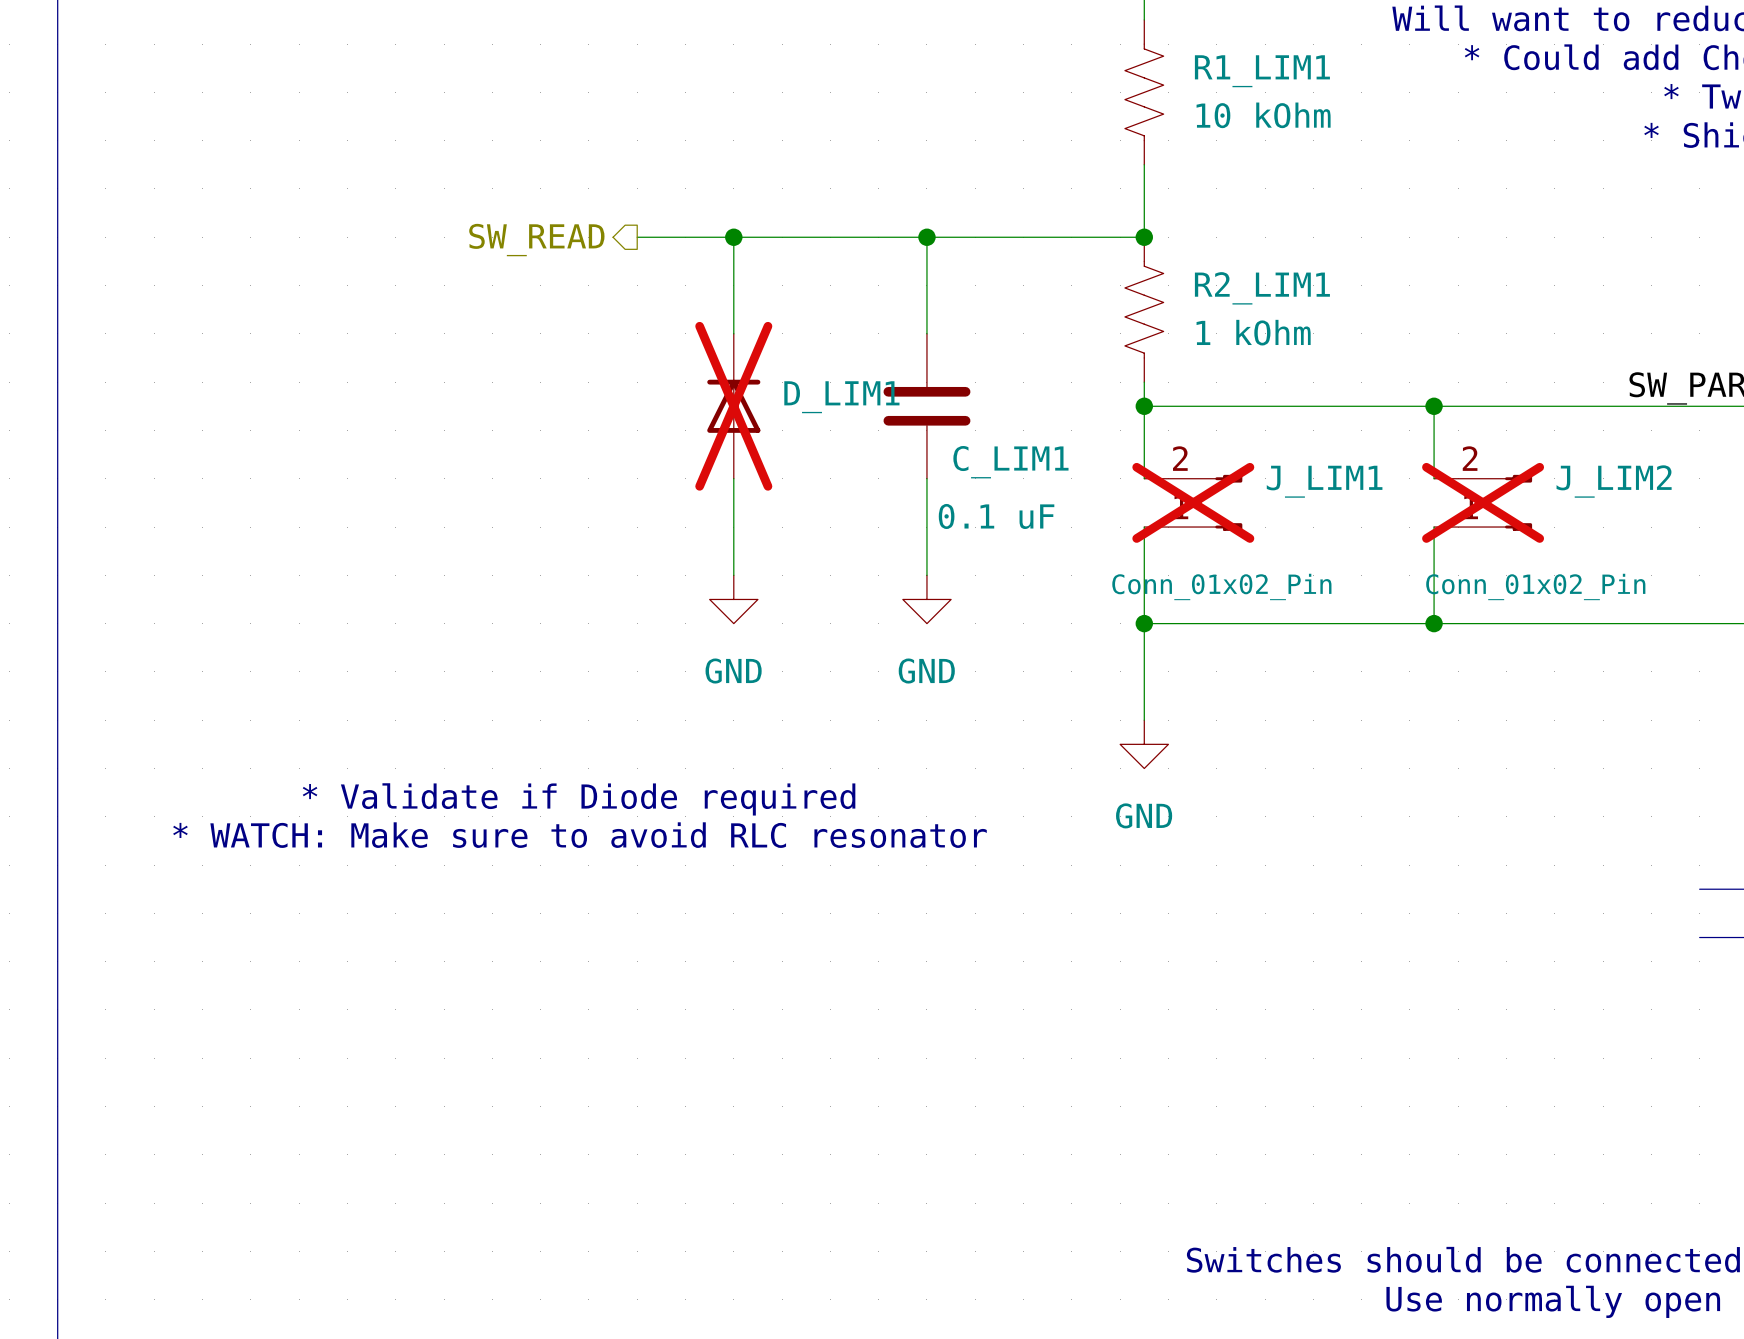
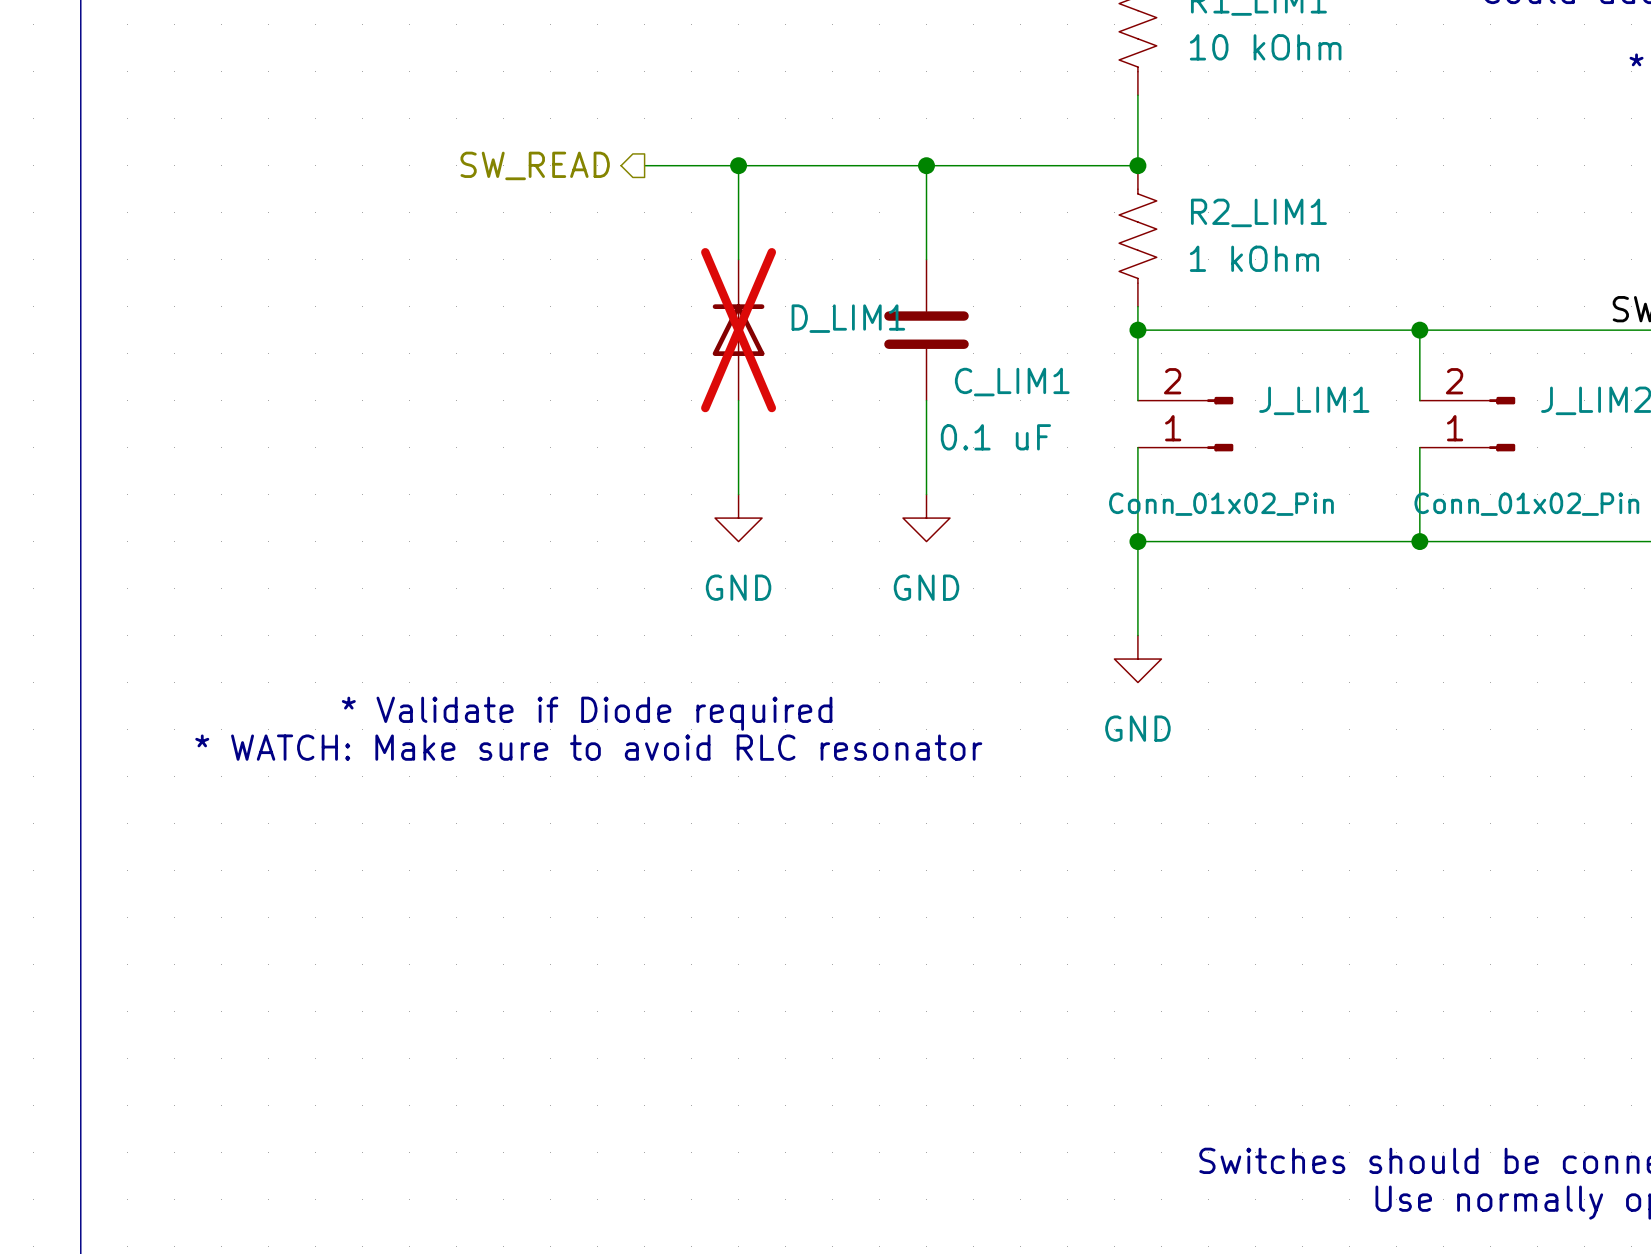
J_LIM1 do-not-place cross: (1193, 502) -> none
J_LIM2 do-not-place cross: (1483, 502) -> none

